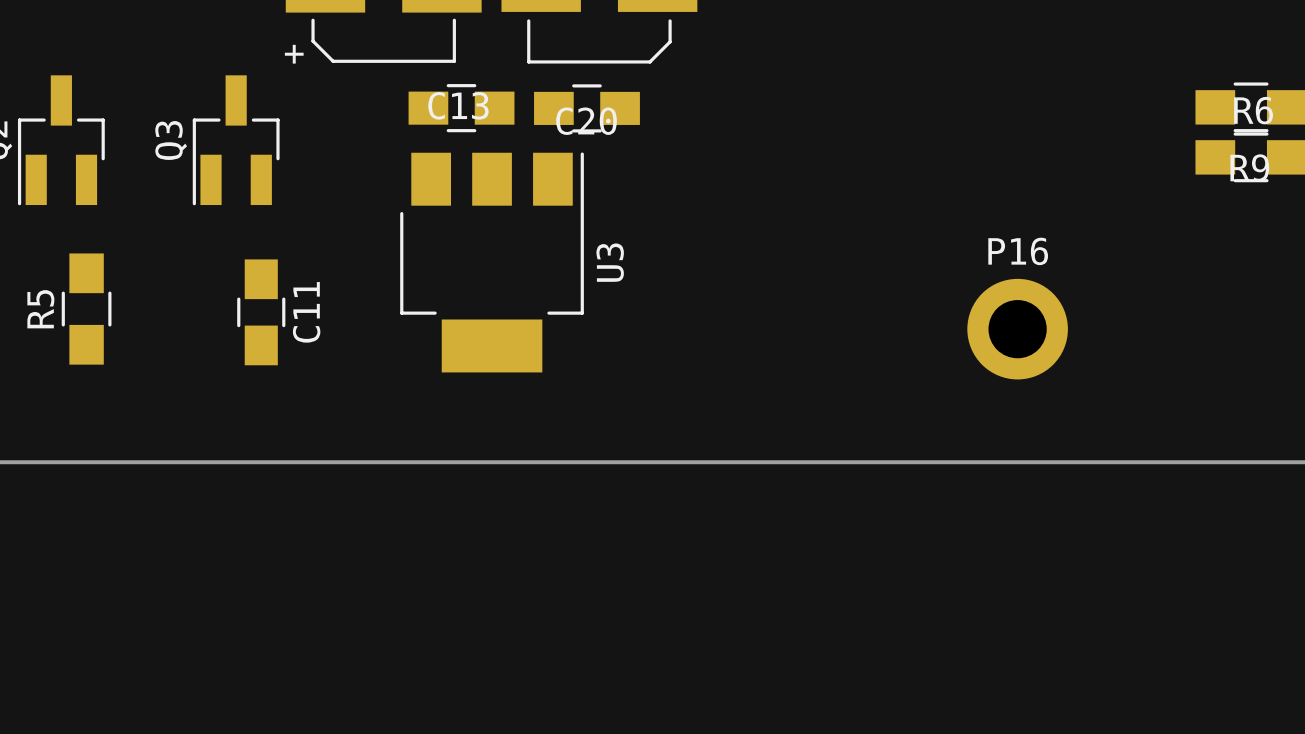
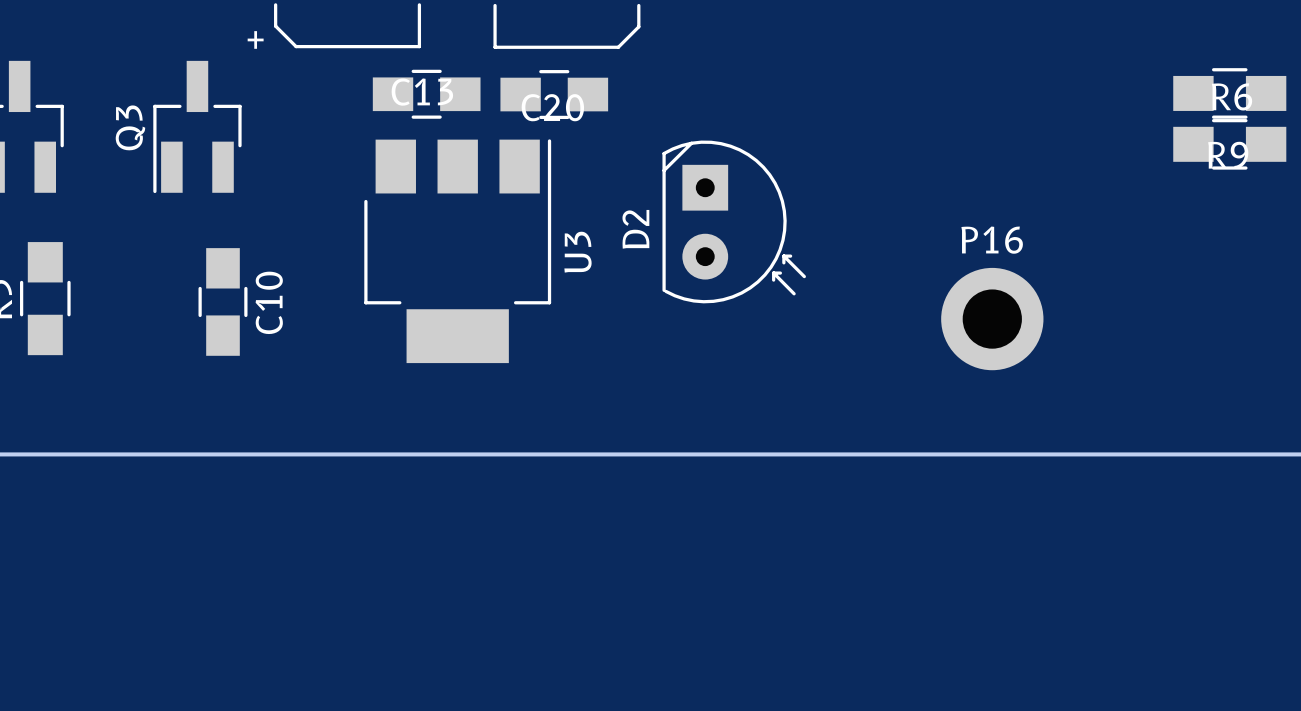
D2: none -> (734, 221)
C11 name: C11 (306, 312) -> C10 (269, 302)

